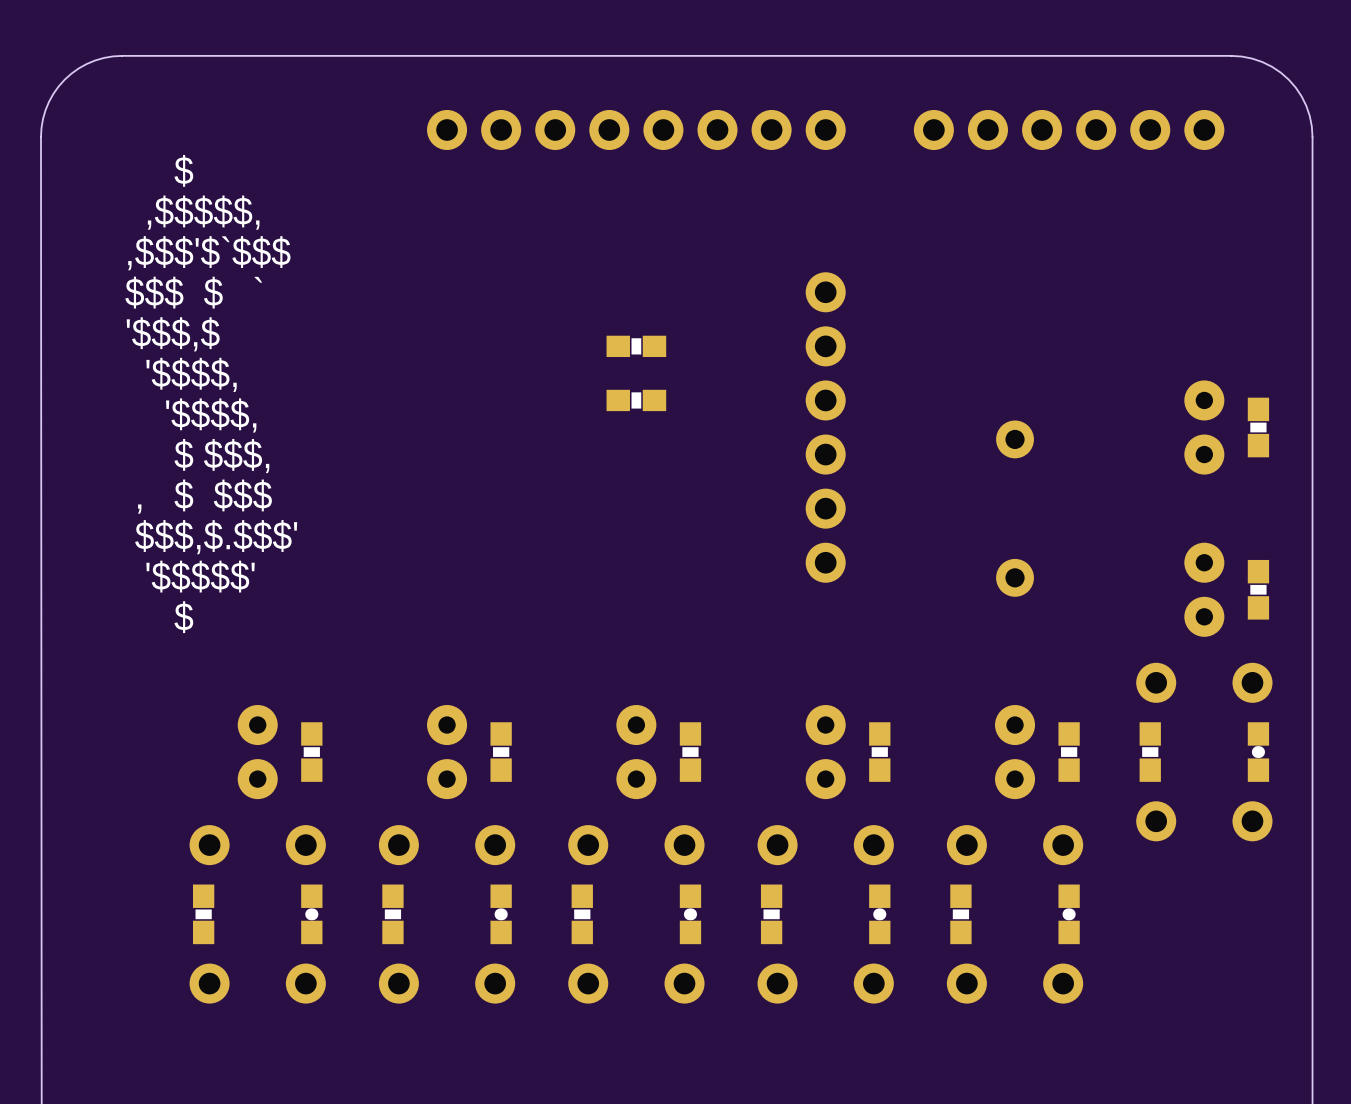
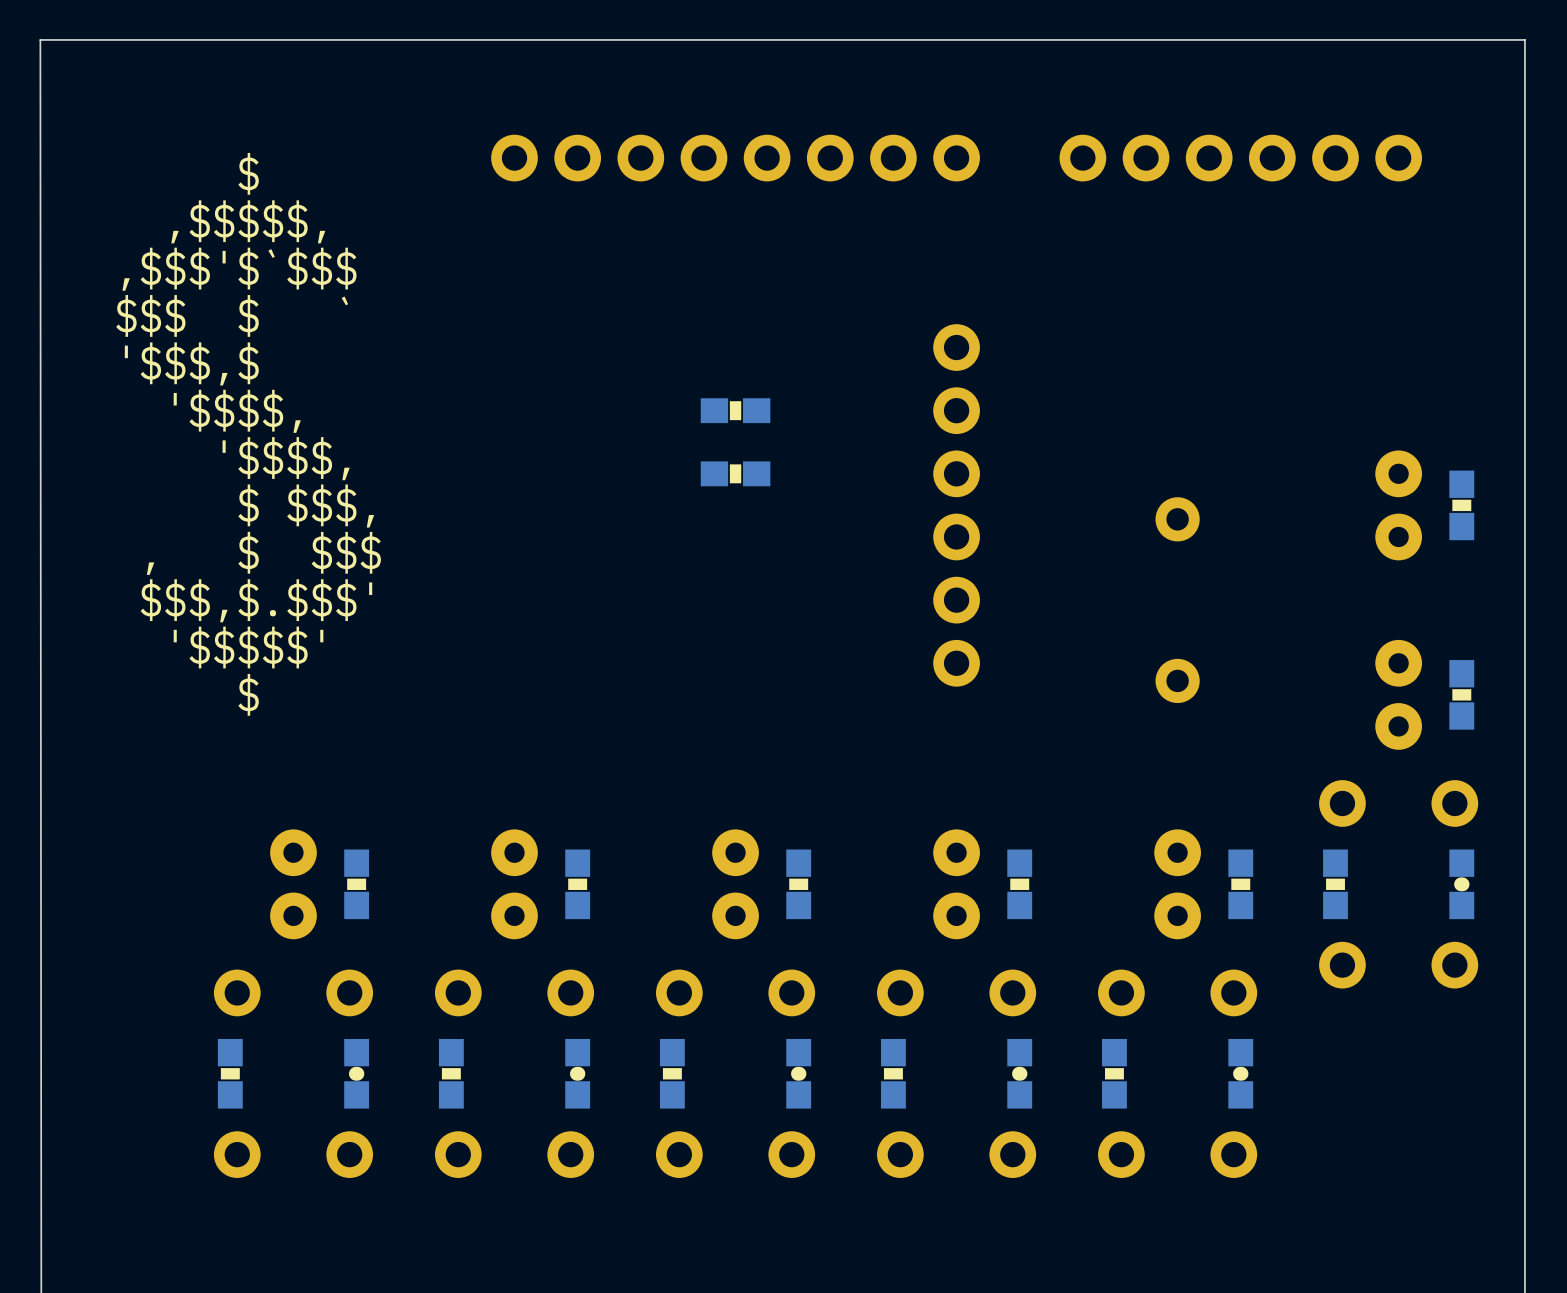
board edge: (1312, 137) (1306, 105) (1288, 79) (1271, 66) (1241, 56) (122, 55) (95, 60) (78, 68) (64, 79) (49, 101) (43, 119) (40, 137) -> (1524, 166) (1524, 39) (40, 39) (40, 166)
text position: $ (183, 170) -> $ (248, 173)
text position: ,$$$$$, (203, 212) -> ,$$$$$, (248, 221)
text position: ,$$$'$`$$$ (209, 253) -> ,$$$'$`$$$ (239, 269)
text position: $$$ $ ` (193, 292) -> $$$ $ ` (232, 315)
text position: '$$$,$ (173, 334) -> '$$$,$ (191, 363)
text: none -> '$$$$, (237, 411)
text: '$$$$, (191, 374) -> none
text: none -> '$$$$, (286, 458)
text: '$$$$, (211, 415) -> none
text position: $ $$$, (221, 456) -> $ $$$, (306, 506)
text position: , $ $$$ (204, 496) -> , $ $$$ (263, 553)
text position: $$$,$.$$$' (216, 537) -> $$$,$.$$$' (256, 600)
text position: '$$$$$' (200, 576) -> '$$$$$' (248, 647)
text position: $ (183, 617) -> $ (248, 694)

